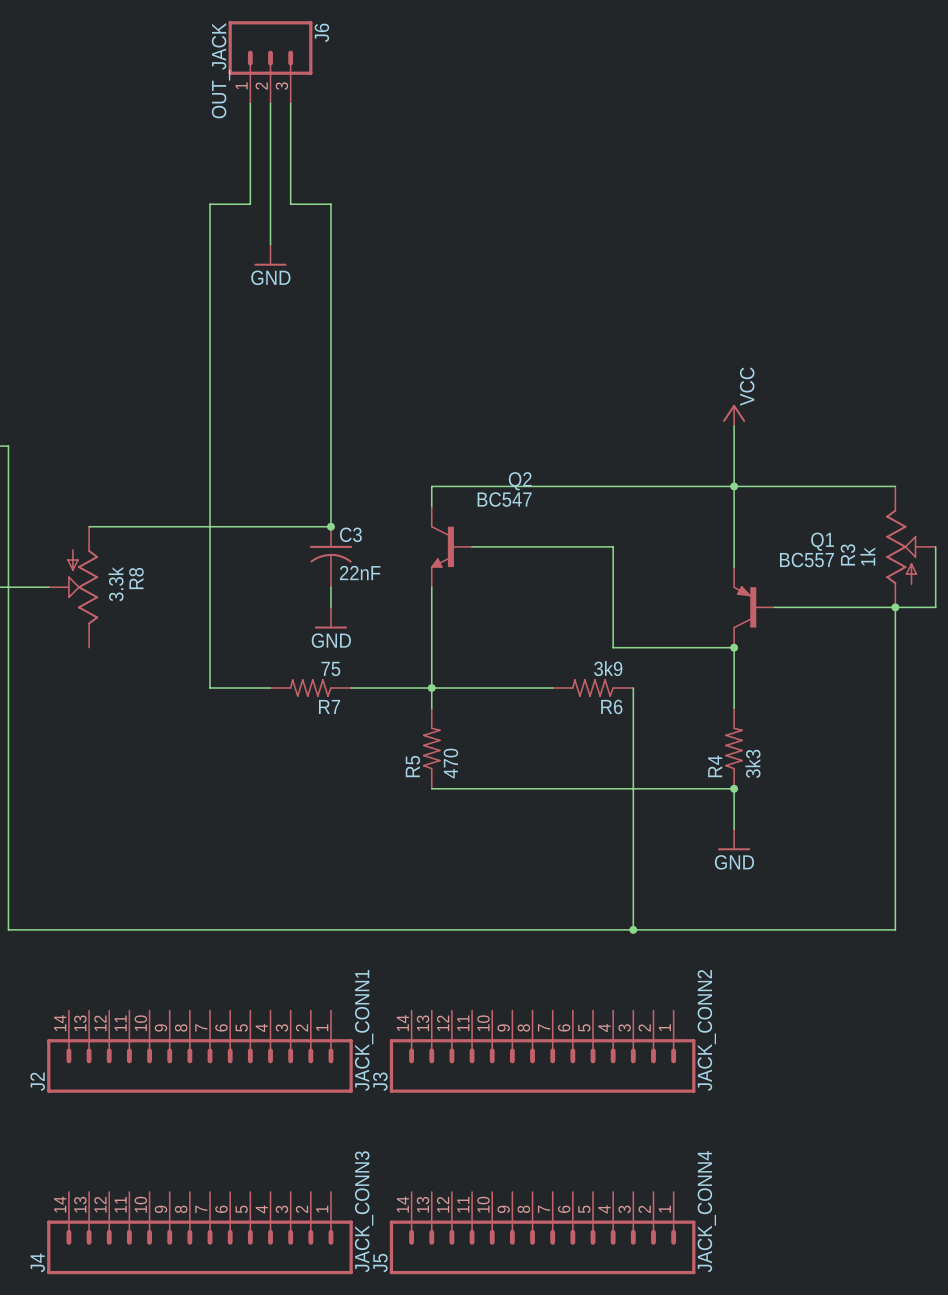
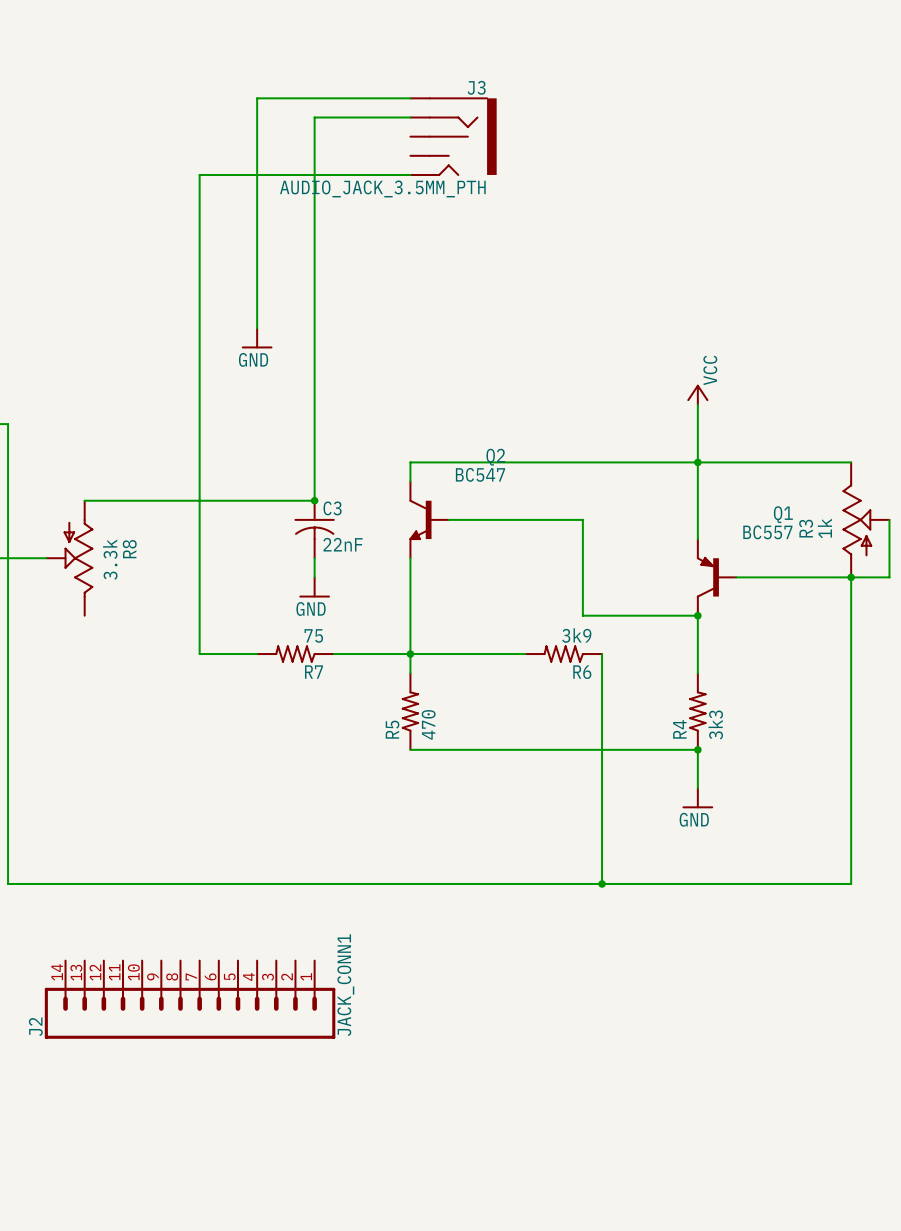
J6: OUT_JACK (270, 62) -> none
wire: (250, 103) (250, 204) (210, 204) -> (410, 174) (199, 174) (199, 194)
wire: none -> (257, 98) (410, 98)
wire: (290, 103) (290, 204) (330, 204) -> (410, 117) (314, 117) (314, 194)
wire: none -> (257, 232) (257, 328)
power symbol position: GND (270, 255) -> GND (257, 338)
J3 symbol: [389, 1010, 696, 1093] -> [410, 97, 497, 176]
J3 value: JACK_CONN2 (706, 1030) -> AUDIO_JACK_3.5MM_PTH (382, 188)
J3 name position: J3 (380, 1081) -> J3 (476, 87)
J4: JACK_CONN3 (199, 1233) -> none
J5: JACK_CONN4 (542, 1233) -> none

